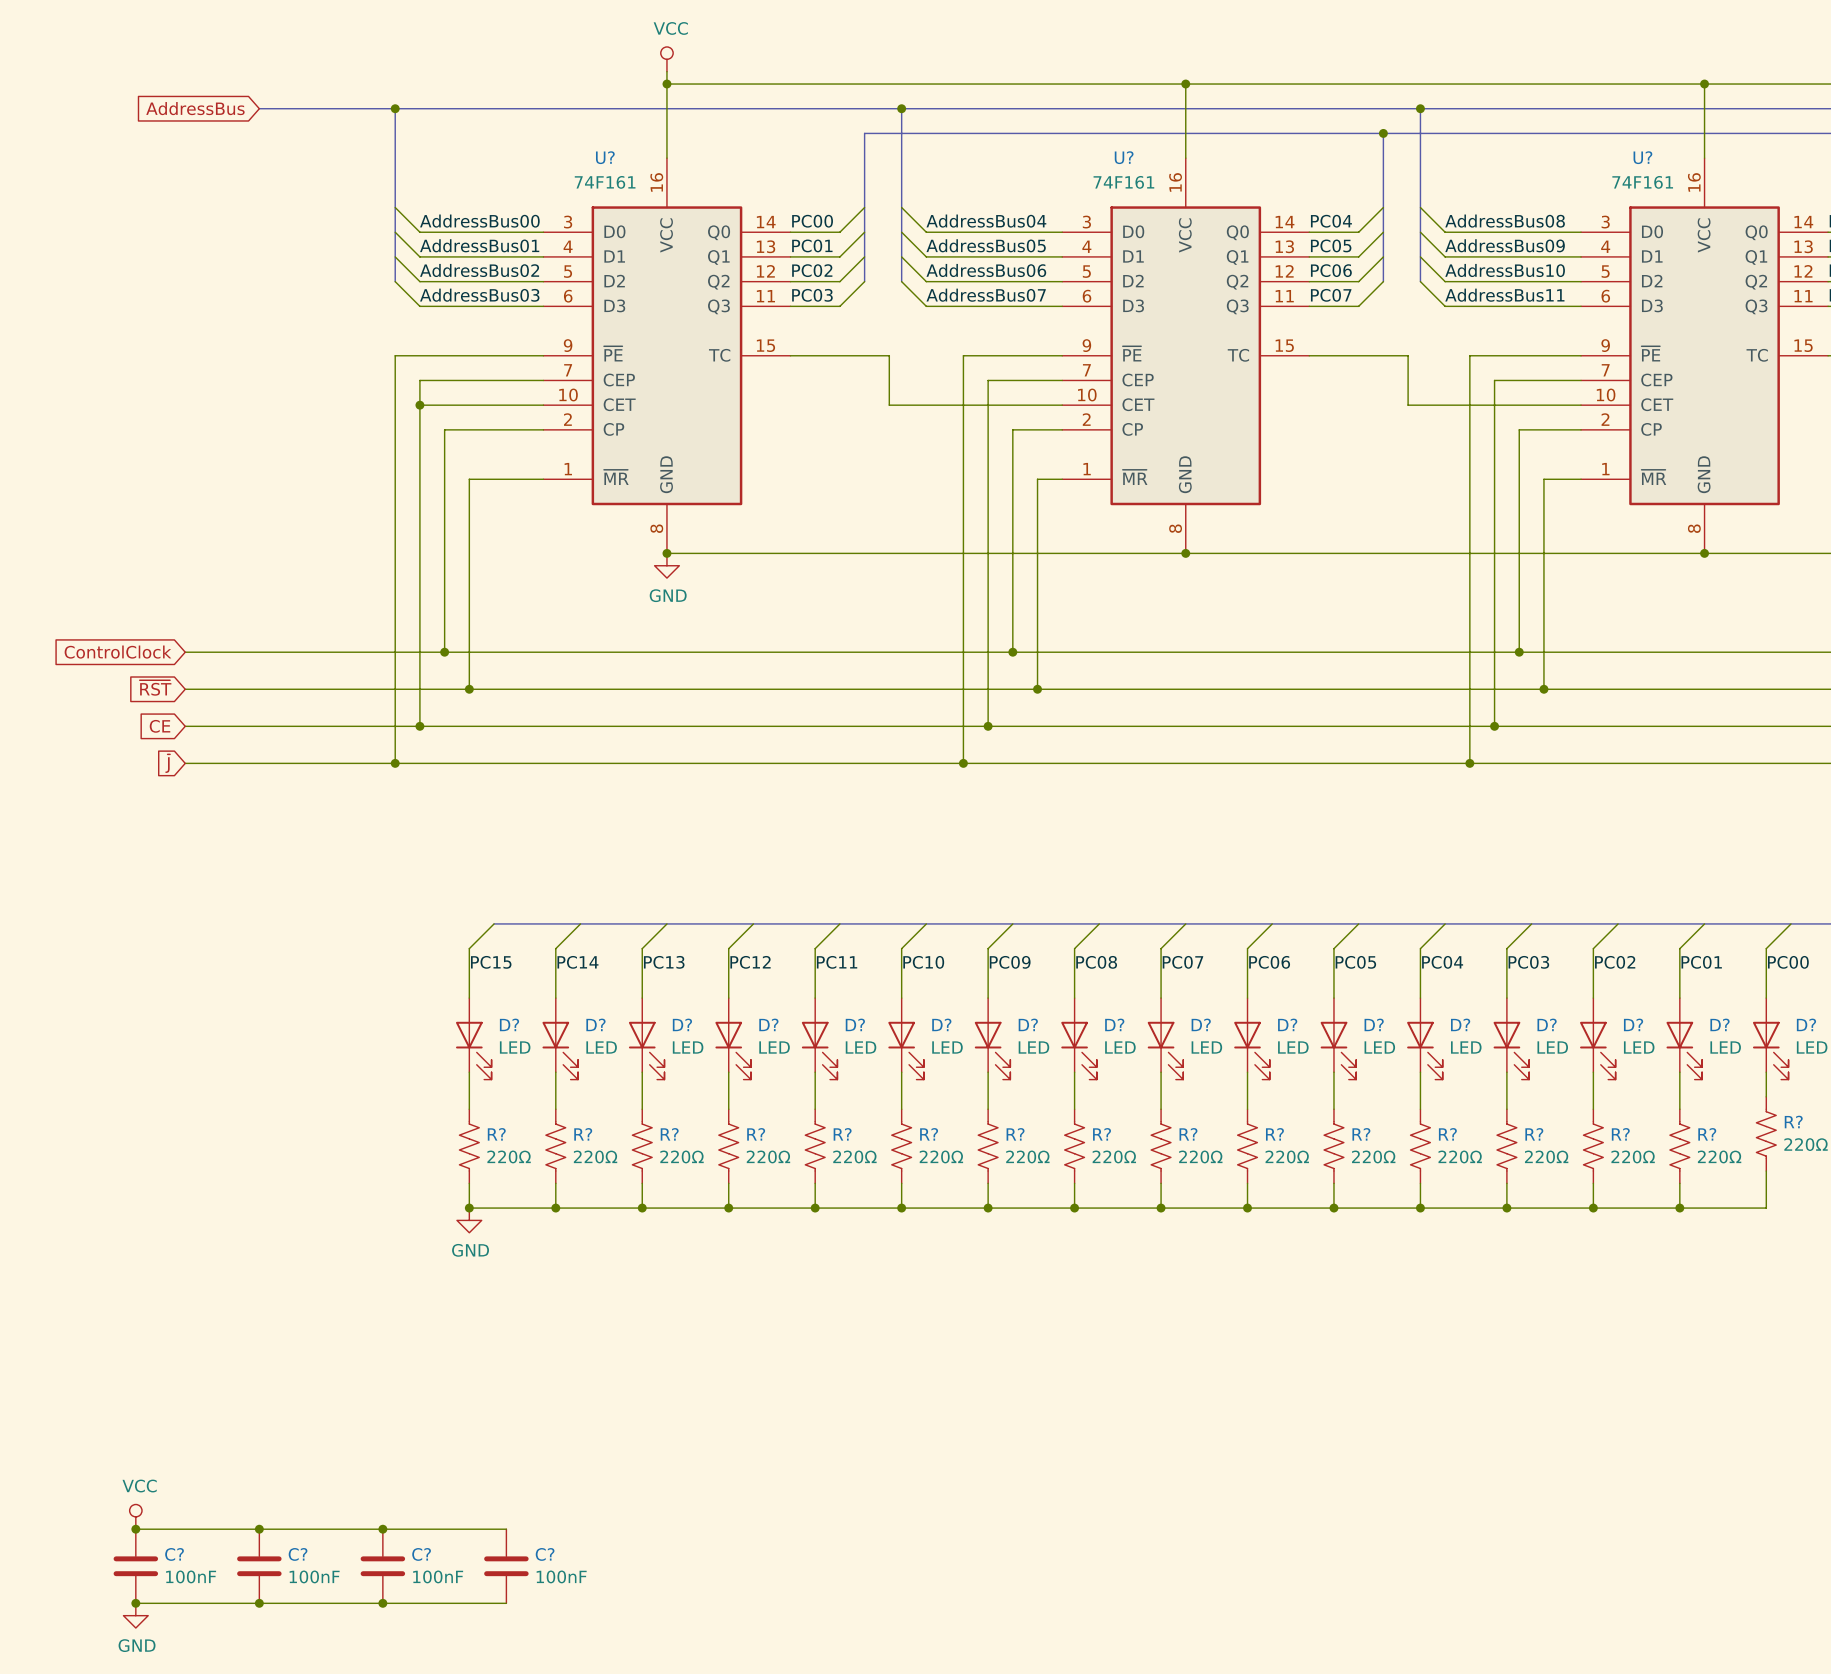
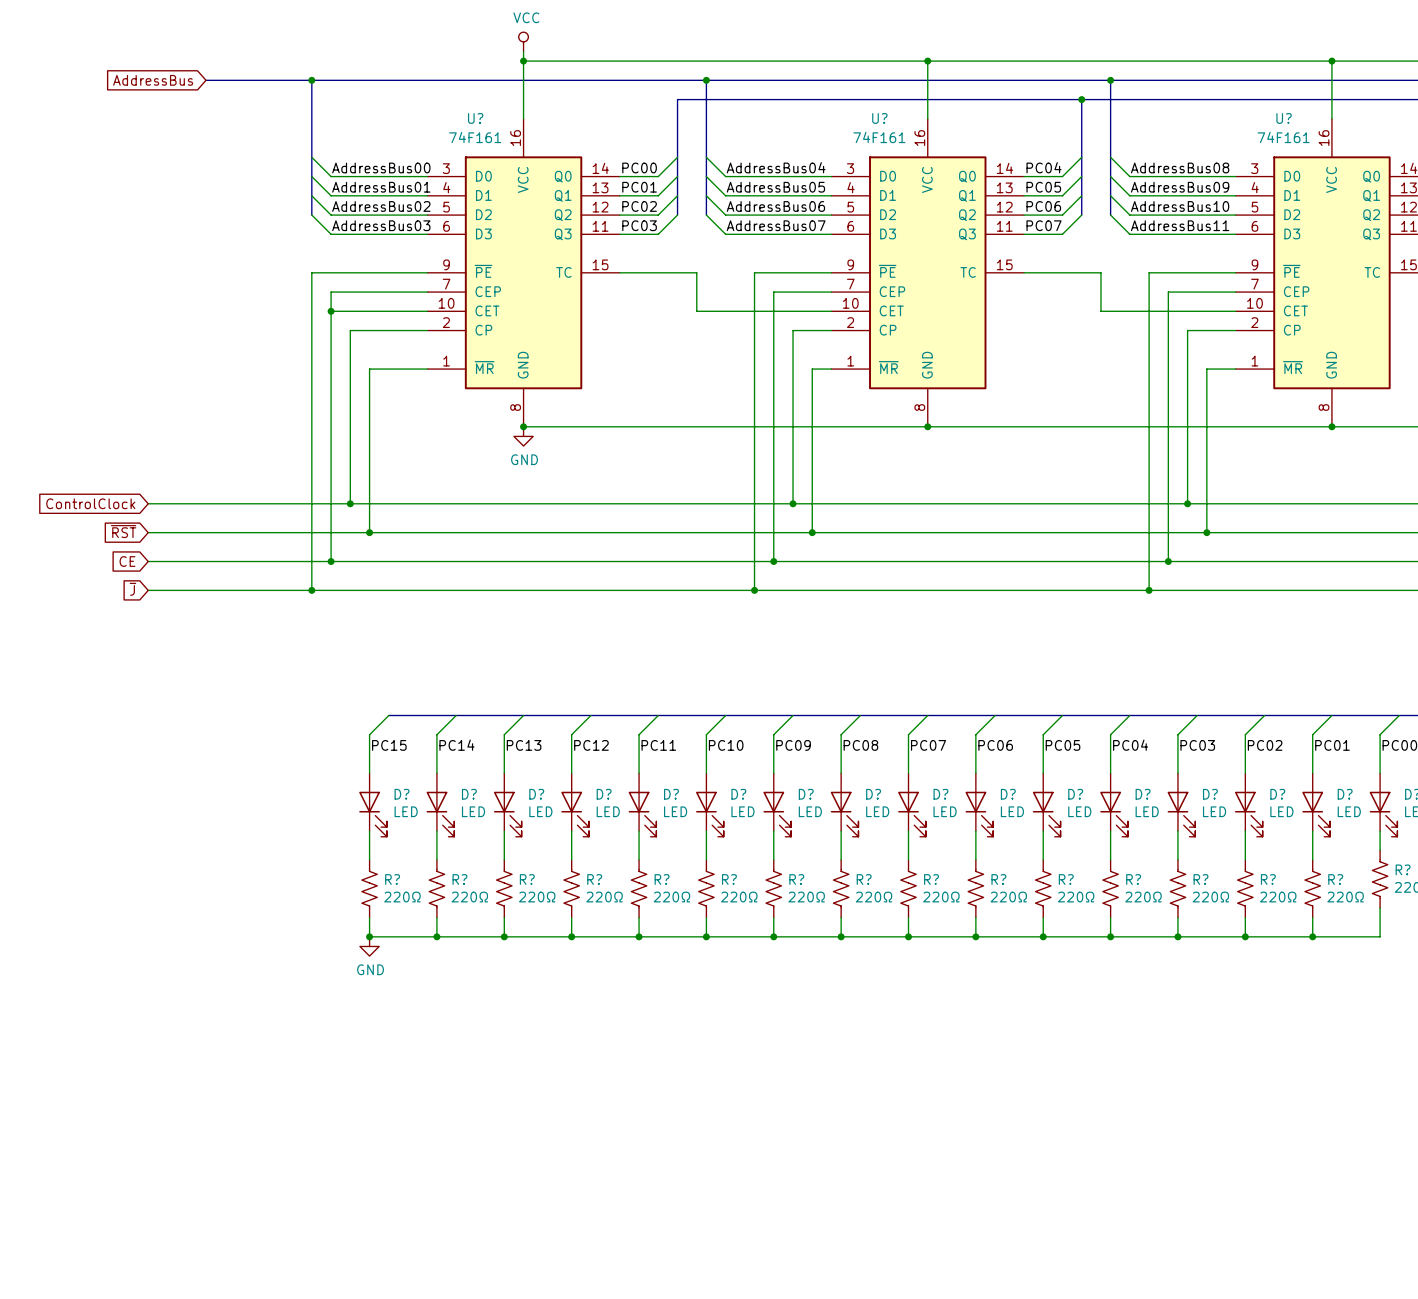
power symbol: VCC (135, 1516) -> none
wire: (135, 1529) (506, 1529) -> none
junction: (135, 1529) -> none
junction: (259, 1529) -> none
junction: (382, 1529) -> none
C?: 100nF (135, 1566) -> none
C?: 100nF (259, 1566) -> none
C?: 100nF (382, 1566) -> none
C?: 100nF (506, 1566) -> none
wire: (135, 1603) (506, 1603) -> none
junction: (135, 1603) -> none
junction: (259, 1603) -> none
junction: (382, 1603) -> none
power symbol: GND (135, 1615) -> none

